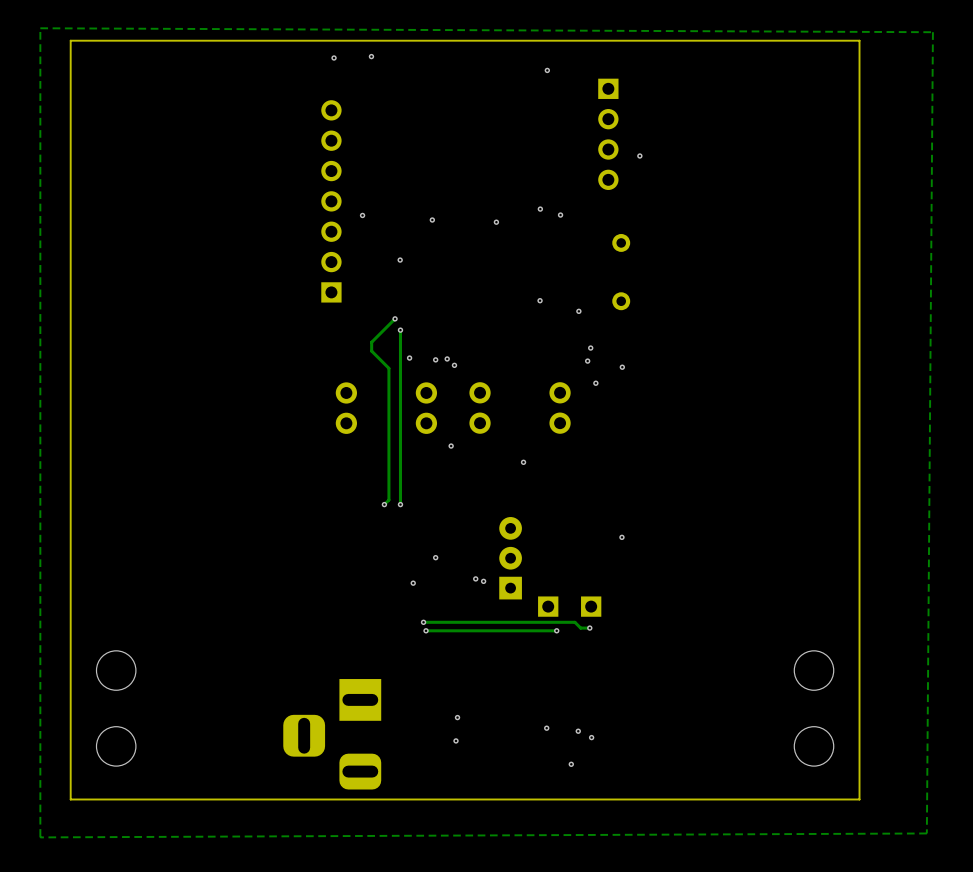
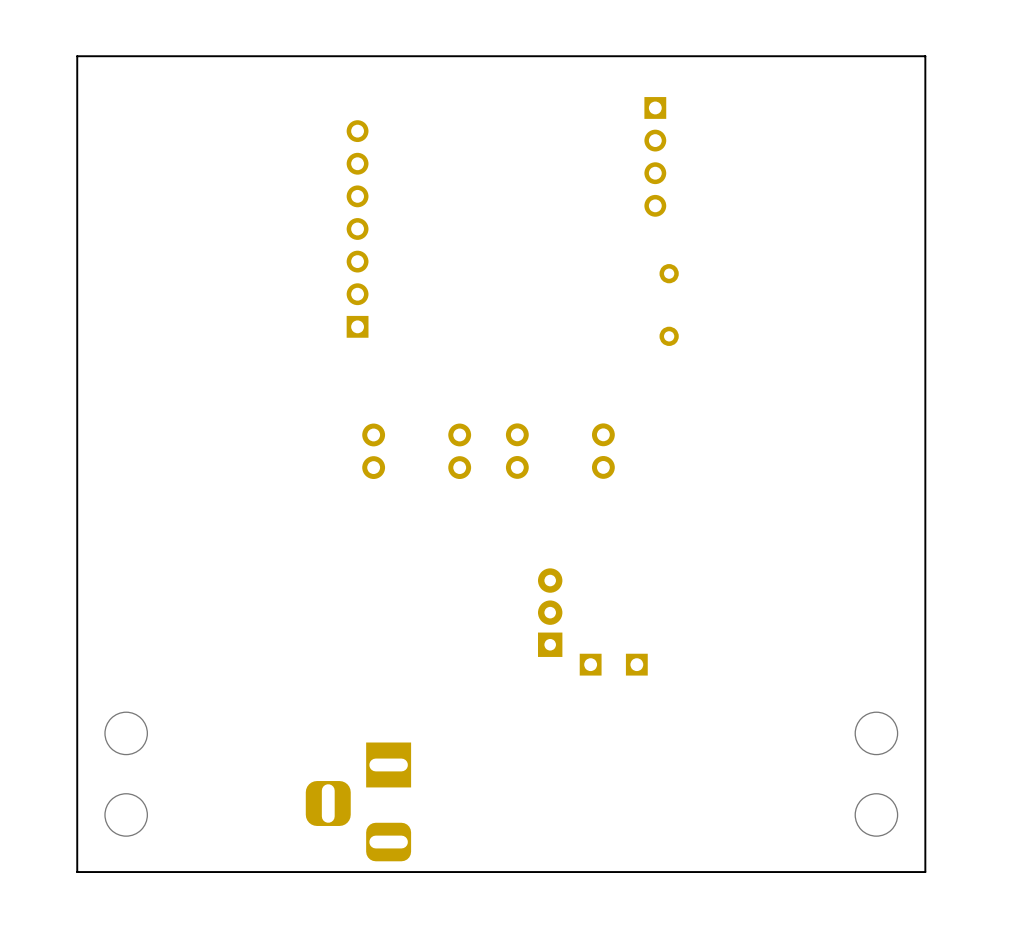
zone outline: (40, 28) (40, 837) (926, 833) (932, 32) (40, 28) -> none
via: (371, 56) -> none
via: (334, 58) -> none
via: (547, 70) -> none
via: (639, 155) -> none
via: (540, 209) -> none
via: (362, 215) -> none
via: (560, 215) -> none
via: (432, 220) -> none
via: (496, 222) -> none
via: (400, 260) -> none
via: (540, 300) -> none
via: (578, 311) -> none
track: (395, 318) (371, 342) (371, 351) (388, 368) (388, 500) (384, 504) -> none
via: (395, 318) -> none
track: (400, 330) (400, 504) -> none
via: (400, 330) -> none
via: (590, 348) -> none
via: (409, 358) -> none
via: (447, 358) -> none
via: (435, 359) -> none
via: (587, 361) -> none
via: (454, 365) -> none
via: (622, 367) -> none
via: (595, 383) -> none
via: (451, 446) -> none
via: (523, 462) -> none
via: (384, 504) -> none
via: (400, 504) -> none
via: (621, 537) -> none
via: (435, 557) -> none
via: (475, 578) -> none
via: (483, 581) -> none
via: (413, 583) -> none
track: (423, 622) (574, 622) (580, 628) (589, 628) -> none
via: (423, 622) -> none
via: (589, 628) -> none
via: (426, 630) -> none
track: (556, 630) (426, 630) -> none
via: (556, 630) -> none
via: (457, 717) -> none
via: (546, 728) -> none
via: (578, 731) -> none
via: (591, 737) -> none
via: (456, 740) -> none
via: (571, 764) -> none

